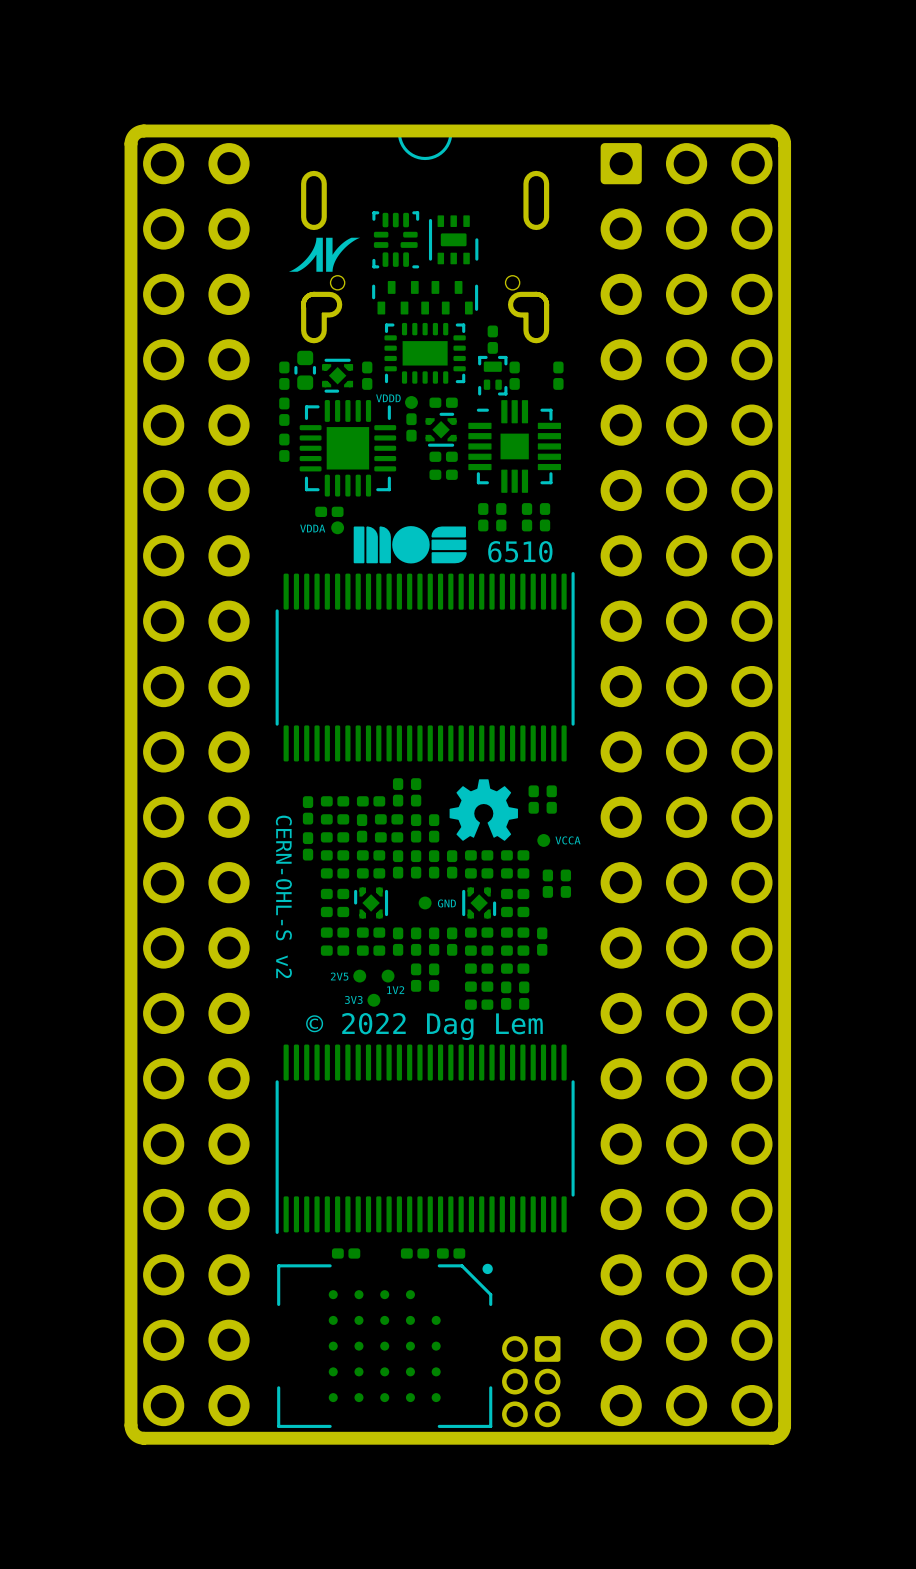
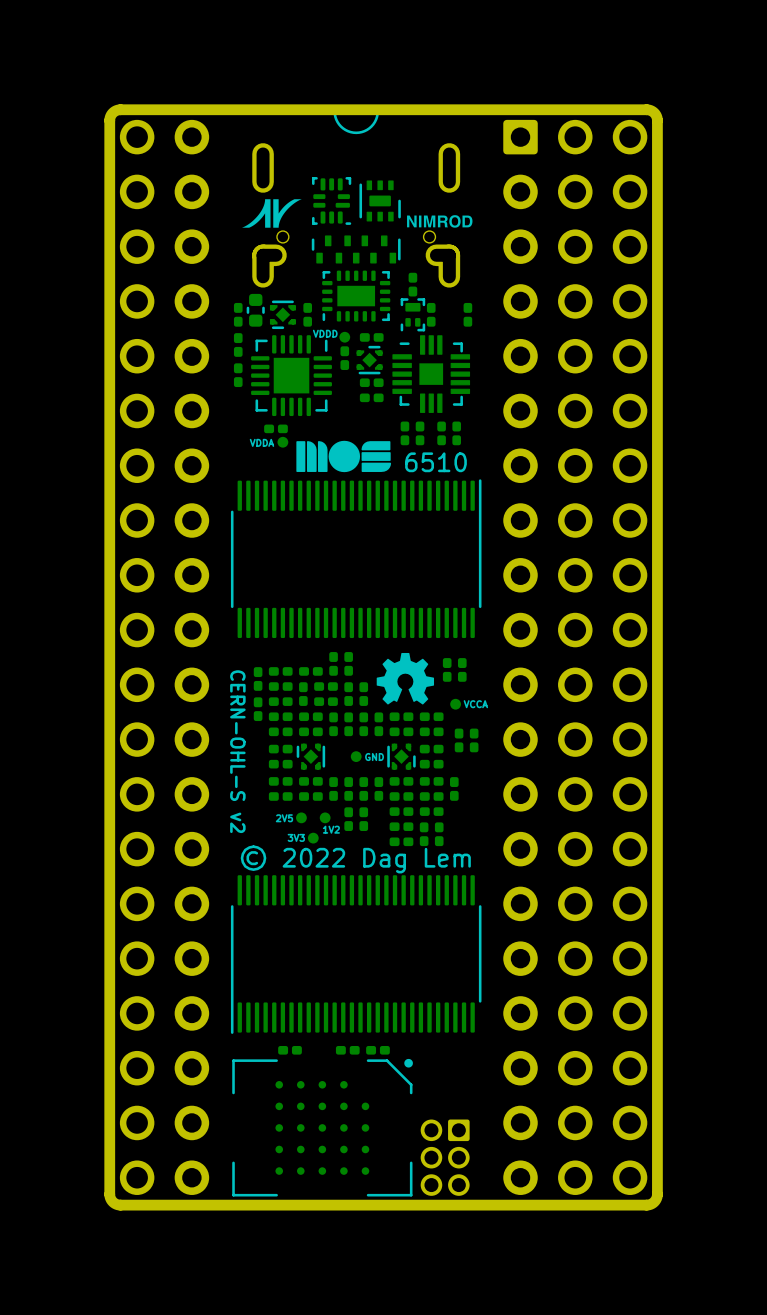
drawing: none -> [407, 215, 473, 228]

